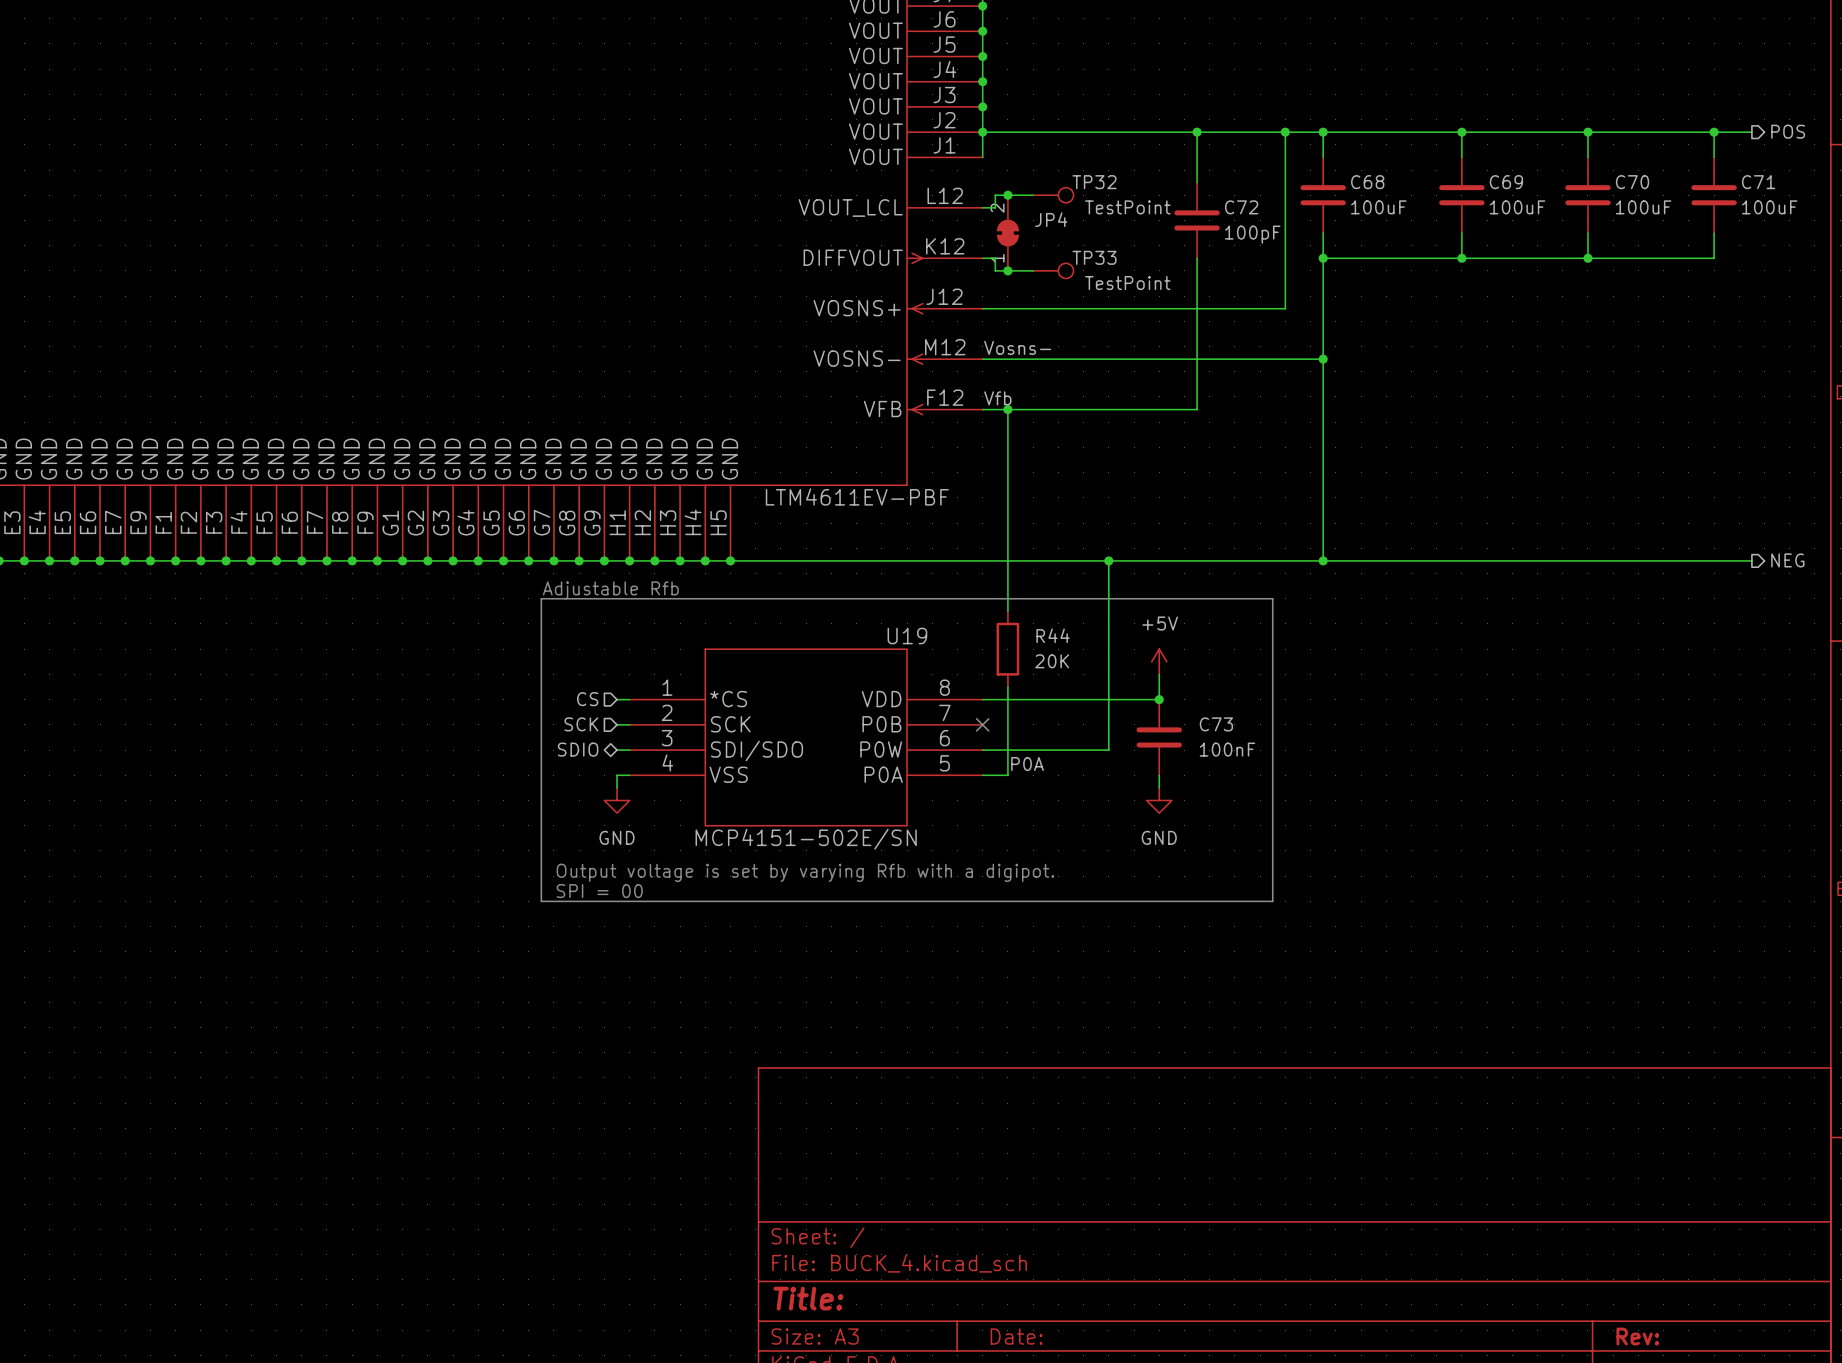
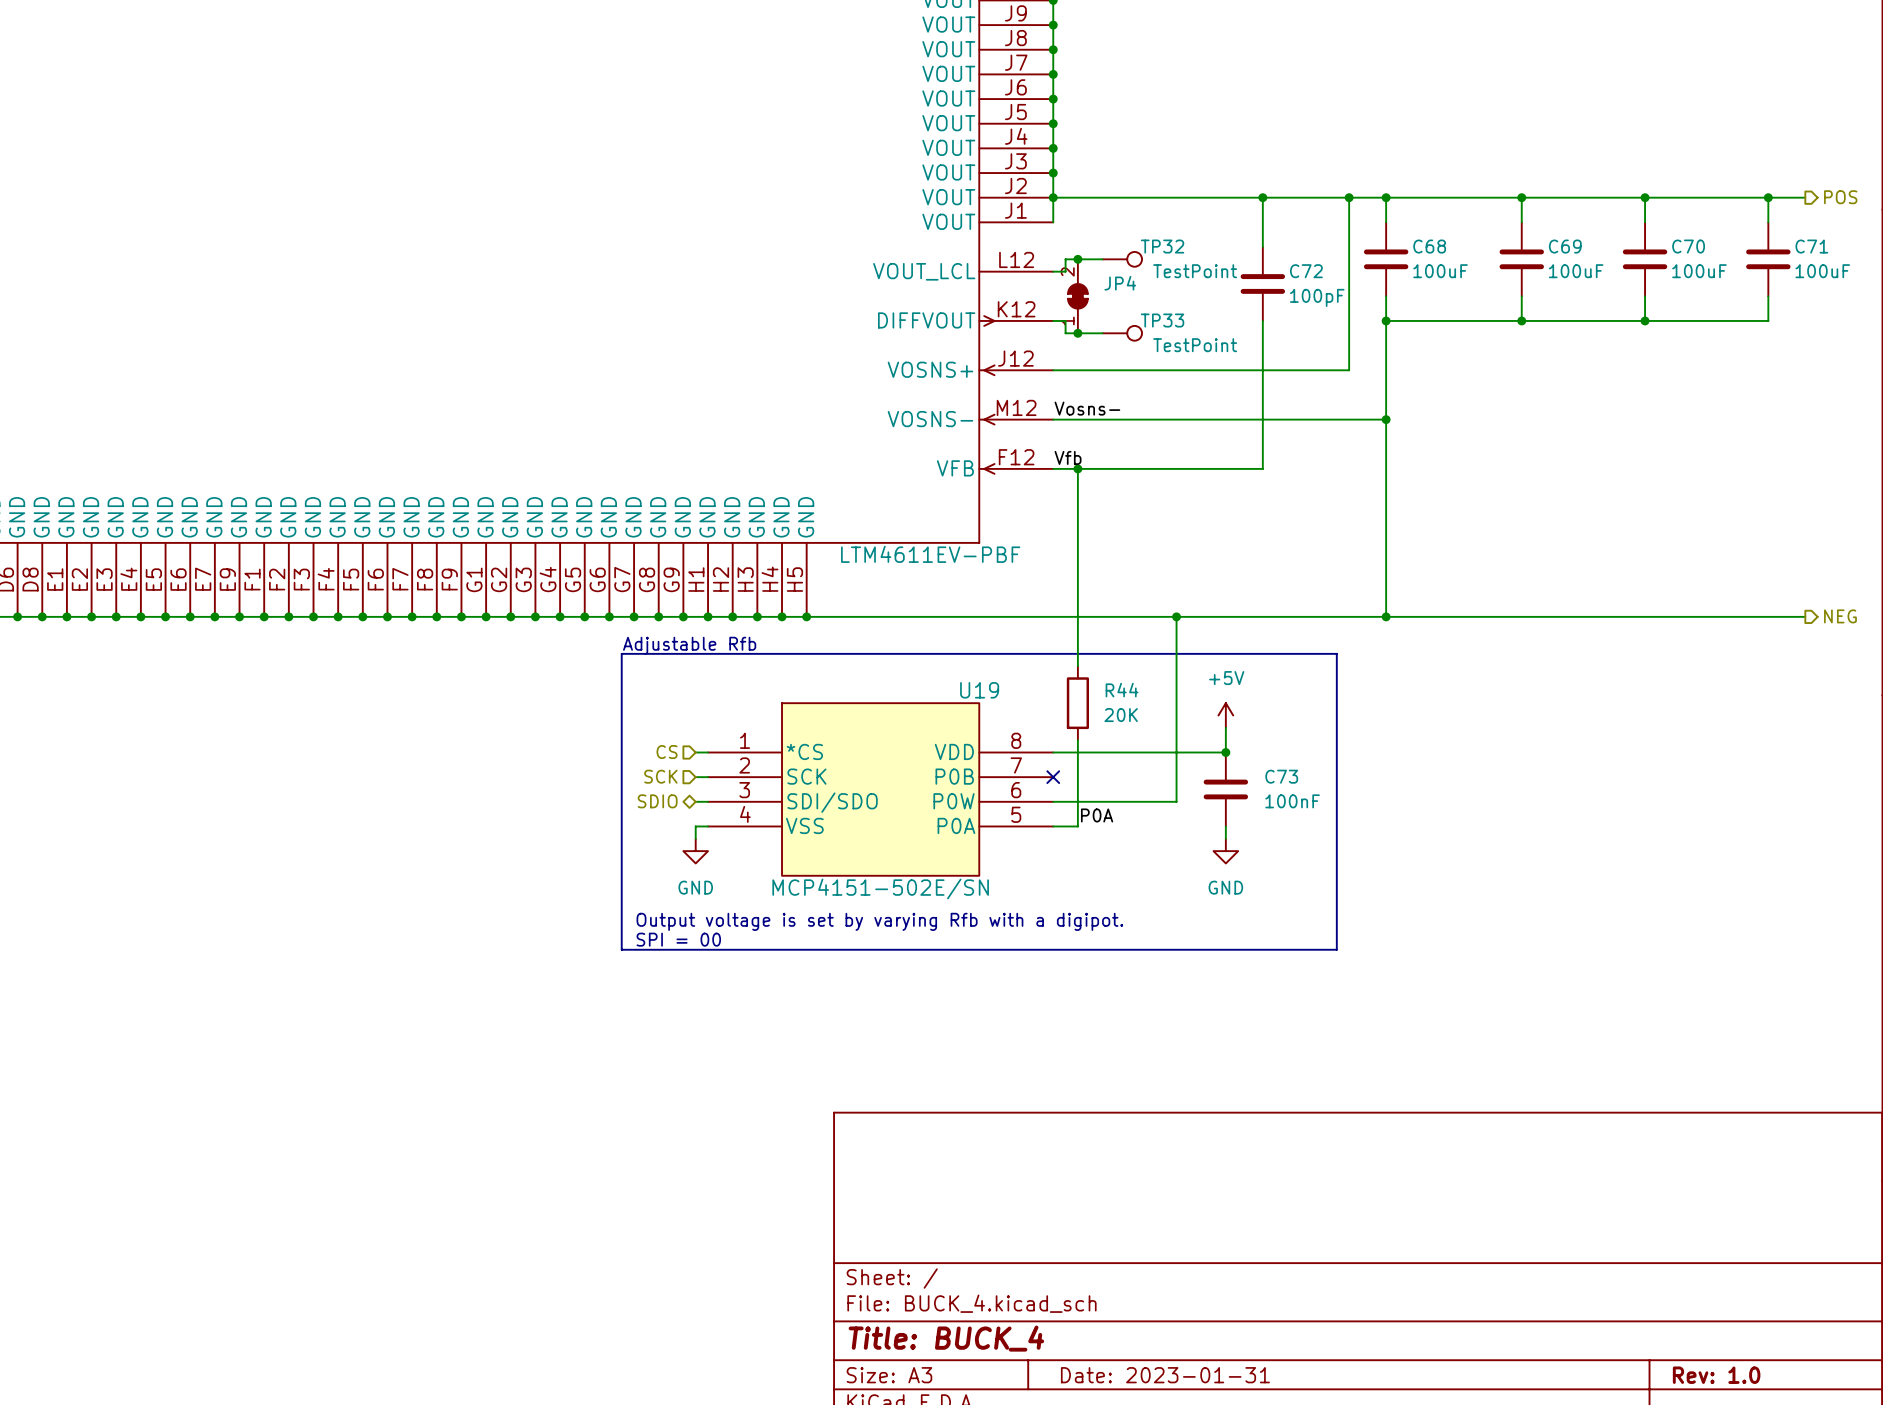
title block: Title: (808, 1298) -> Title: BUCK_4 (946, 1338)
title block: Date: (1016, 1336) -> Date: 2023-01-31 (1165, 1375)
title block: Rev: (1637, 1336) -> Rev: 1.0 (1716, 1375)

